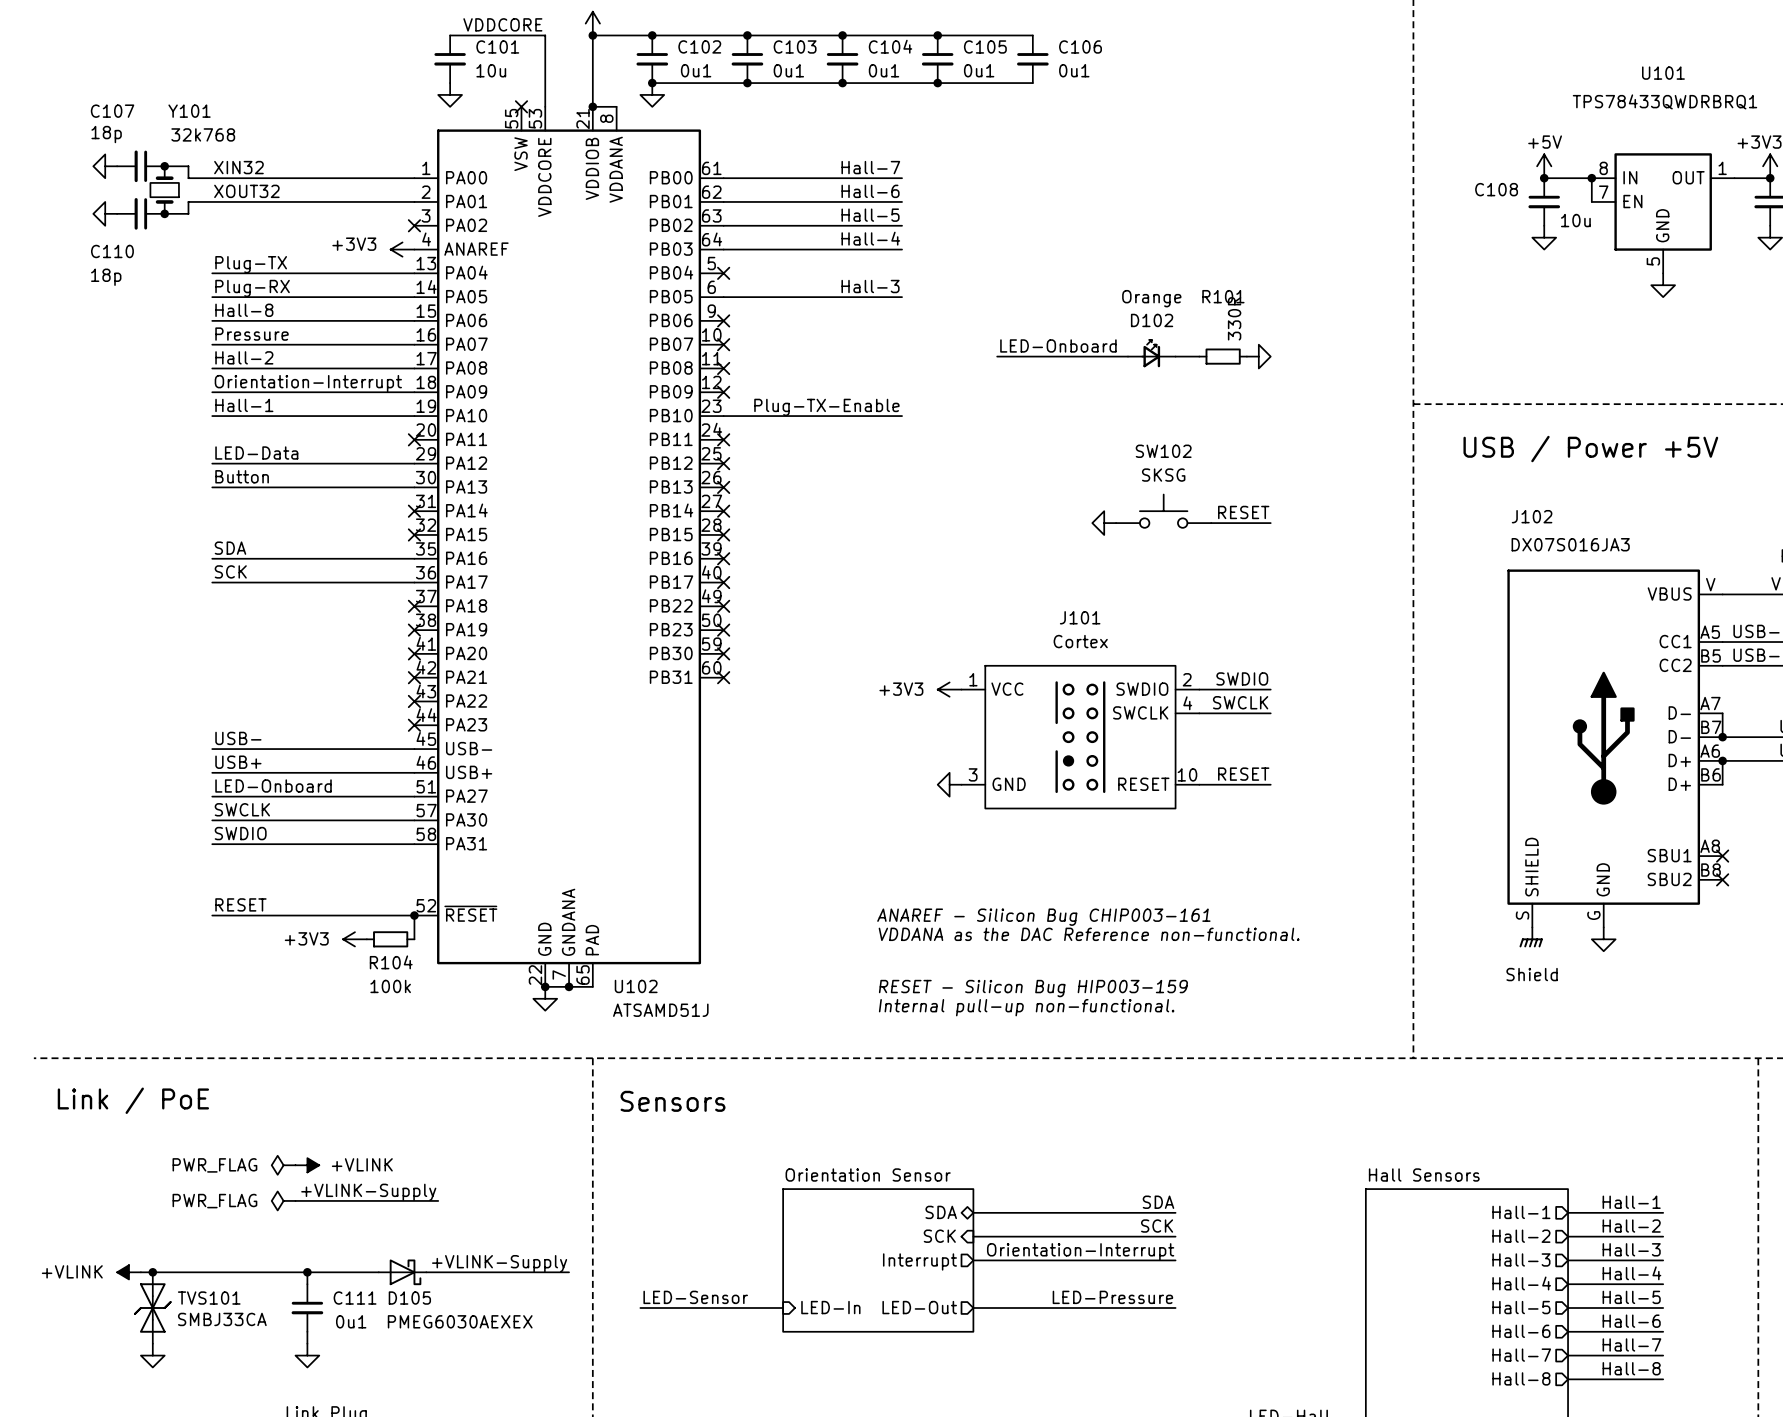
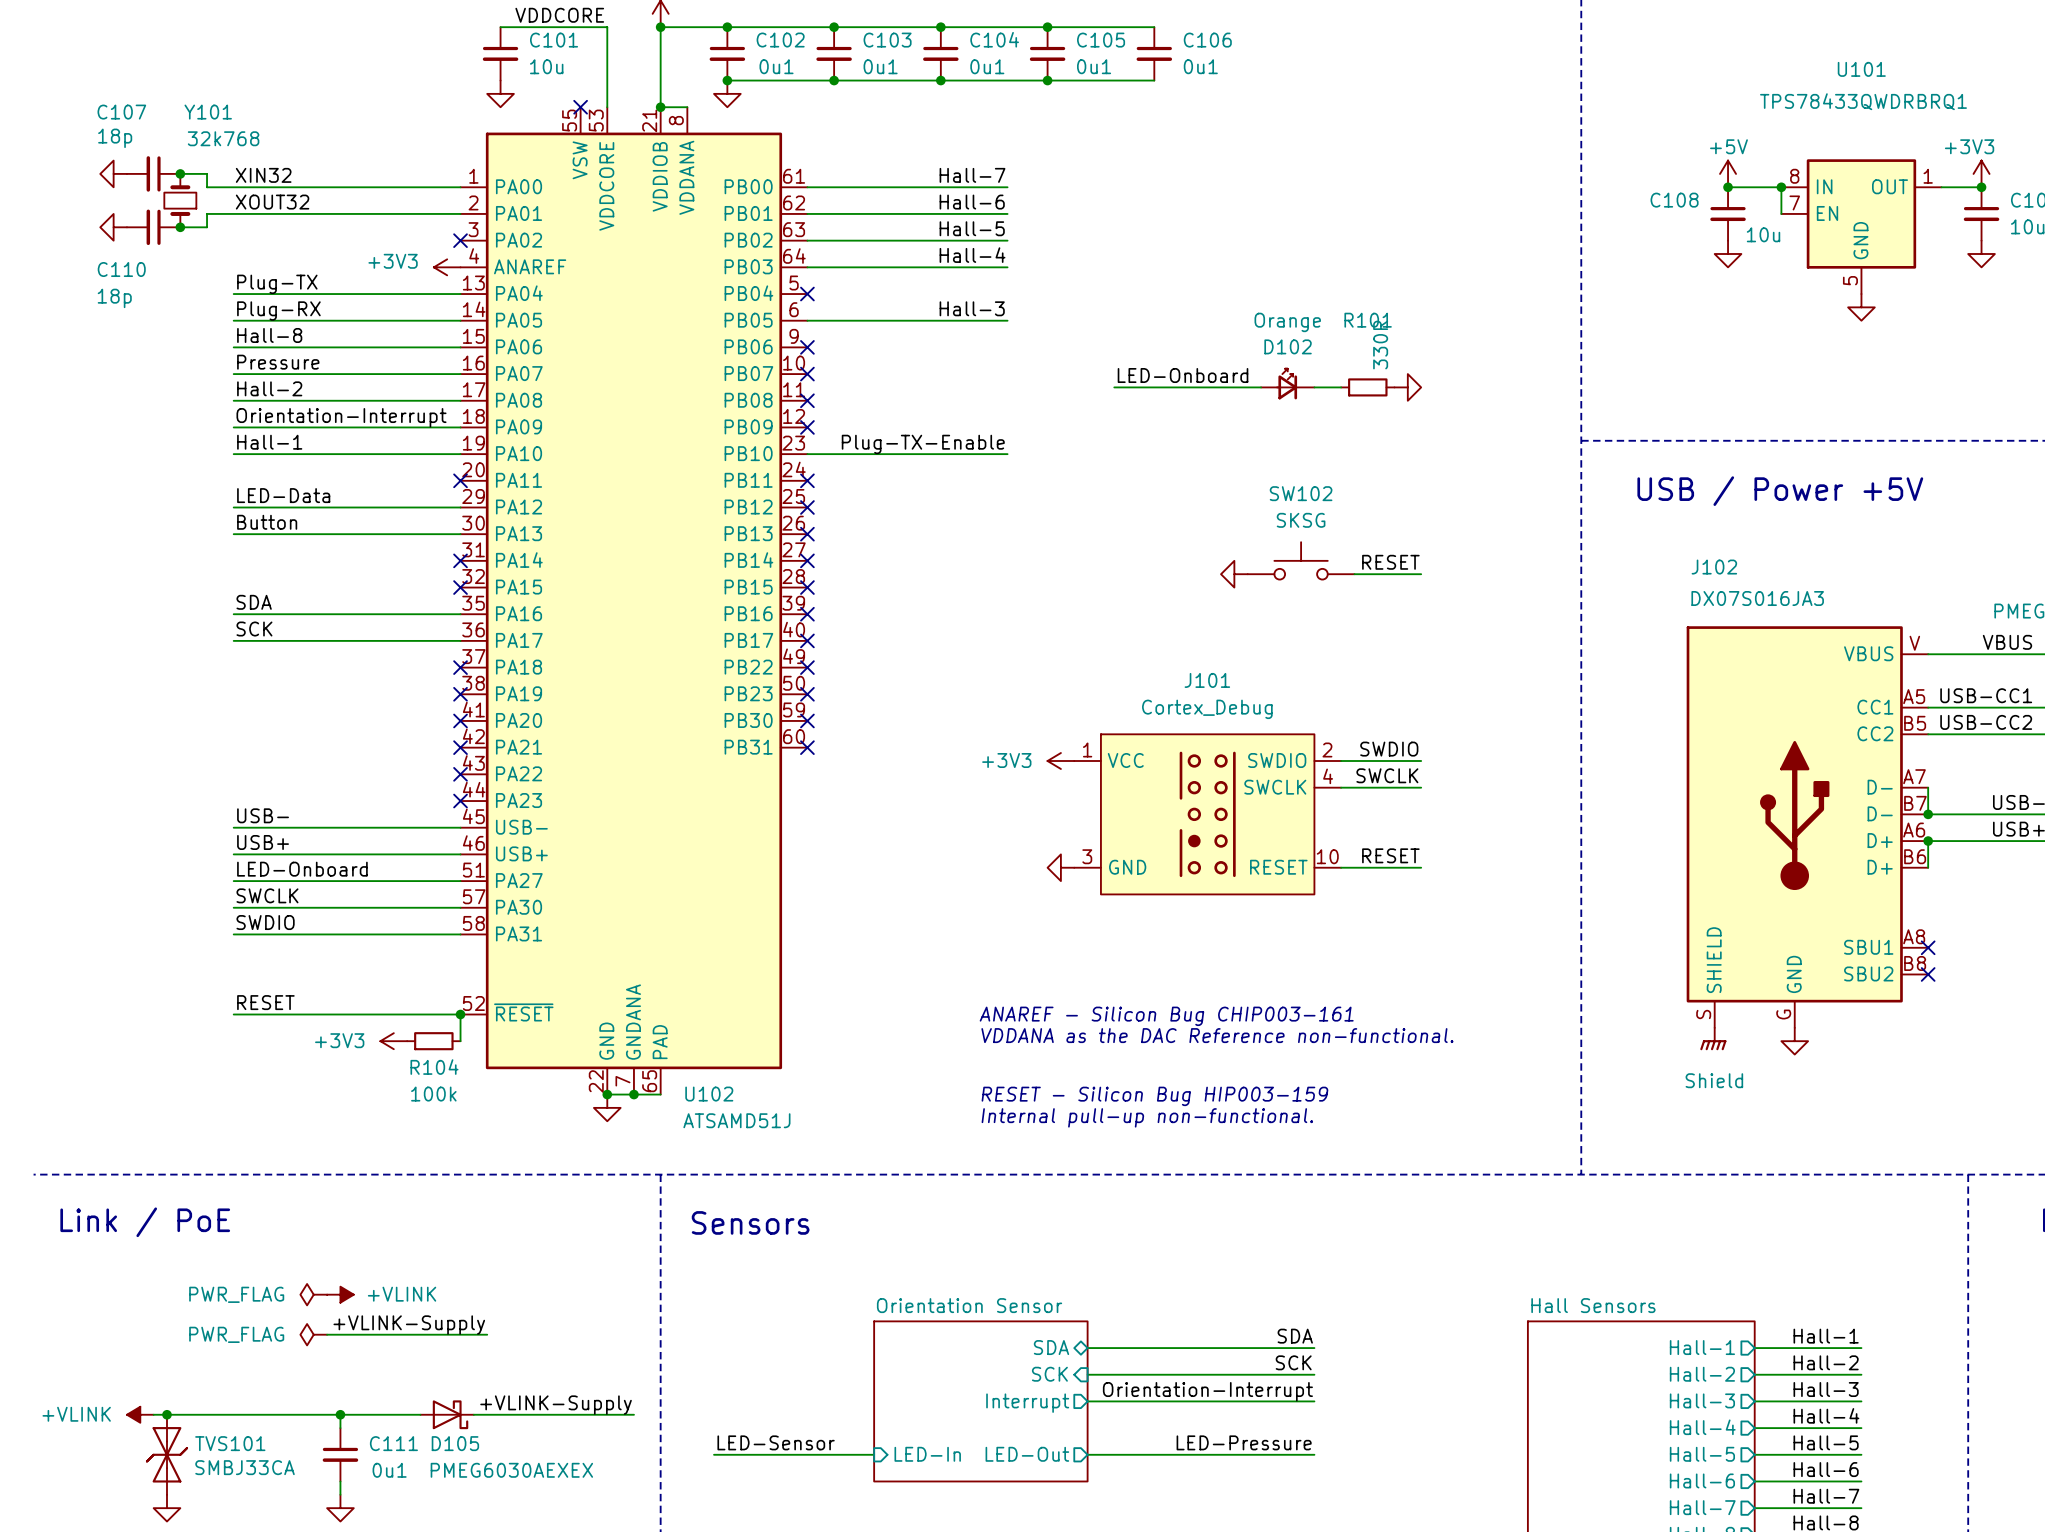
J101 value: Cortex (1080, 641) -> Cortex_Debug (1207, 709)

